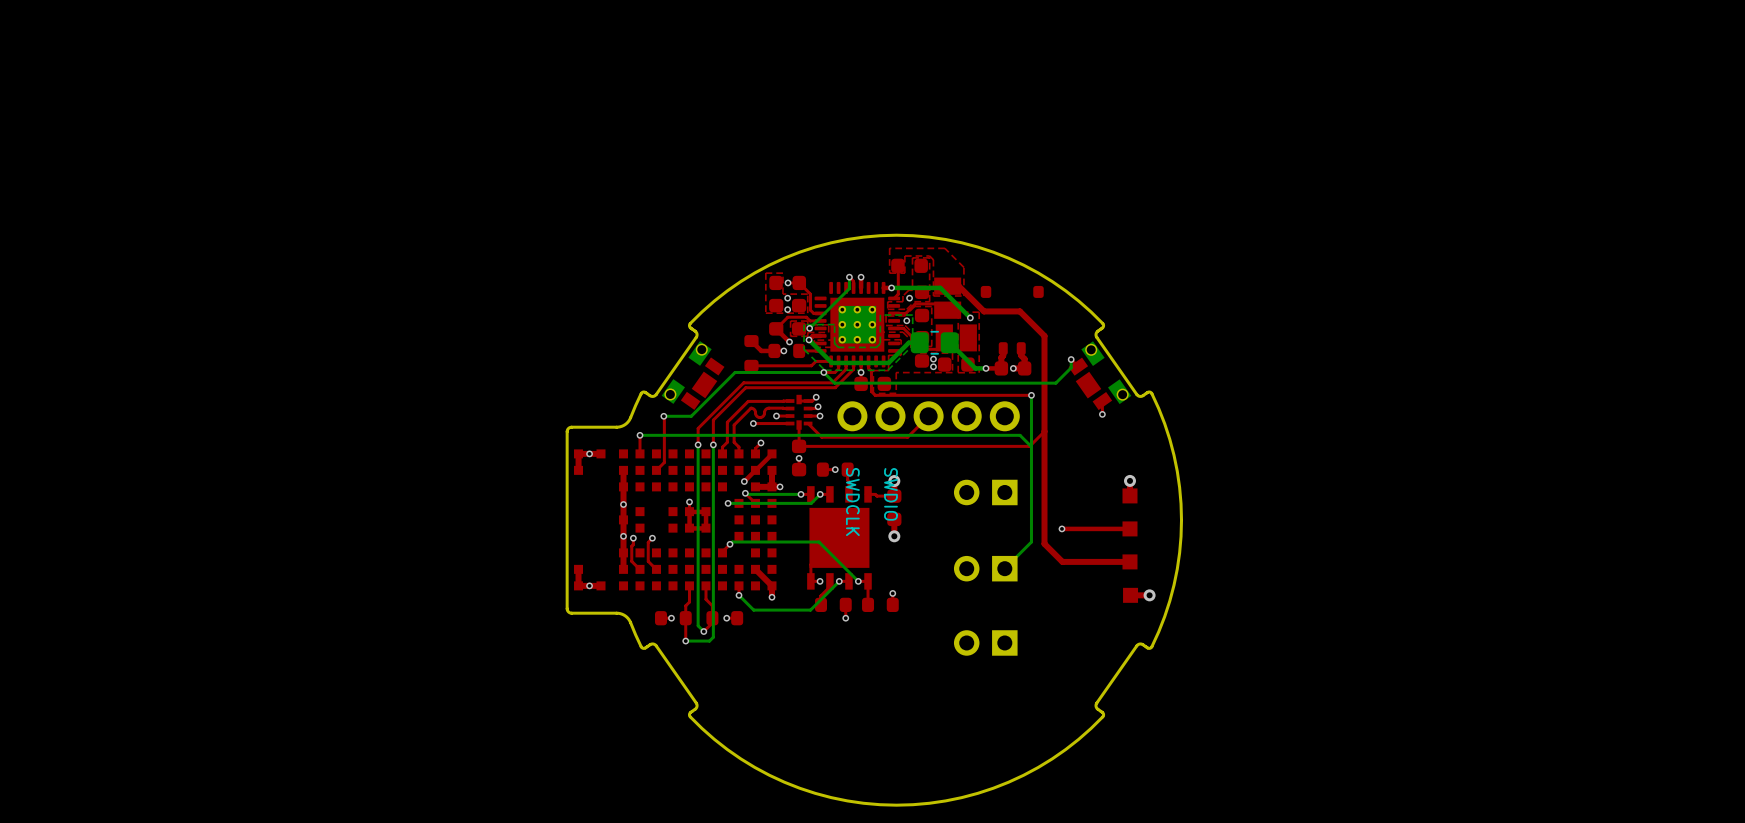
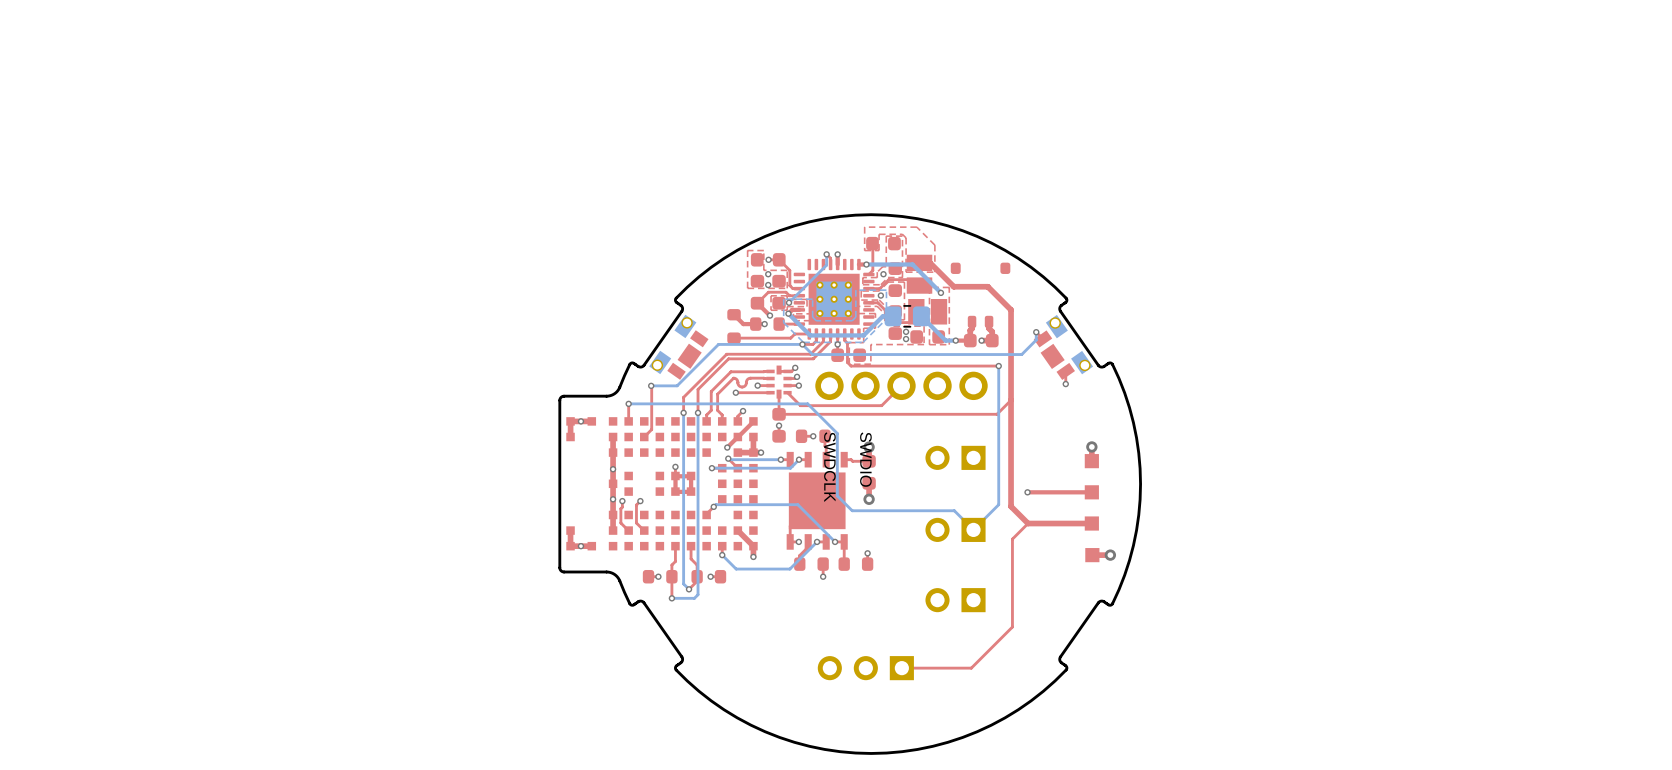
bottom track: (829, 435) (1020, 435) (1031, 446) -> (807, 403) (837, 433) (837, 495) (852, 510) (954, 510) (973, 529)
top track: none -> (1028, 523) (1012, 539) (1012, 627) (971, 668) (901, 668)
part: none -> (865, 668)

